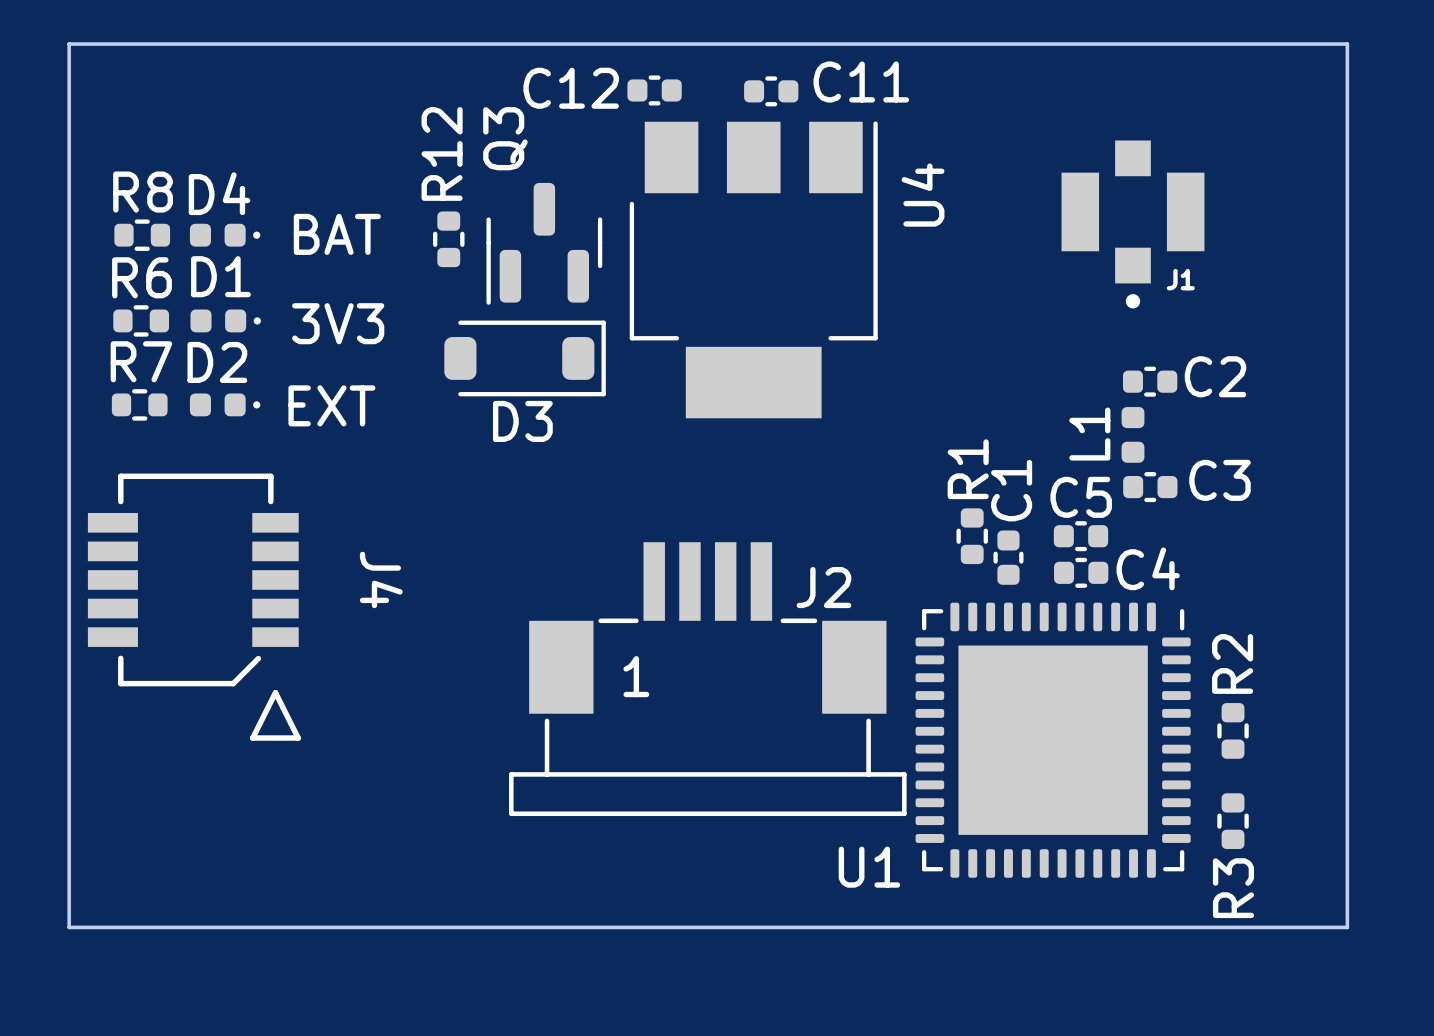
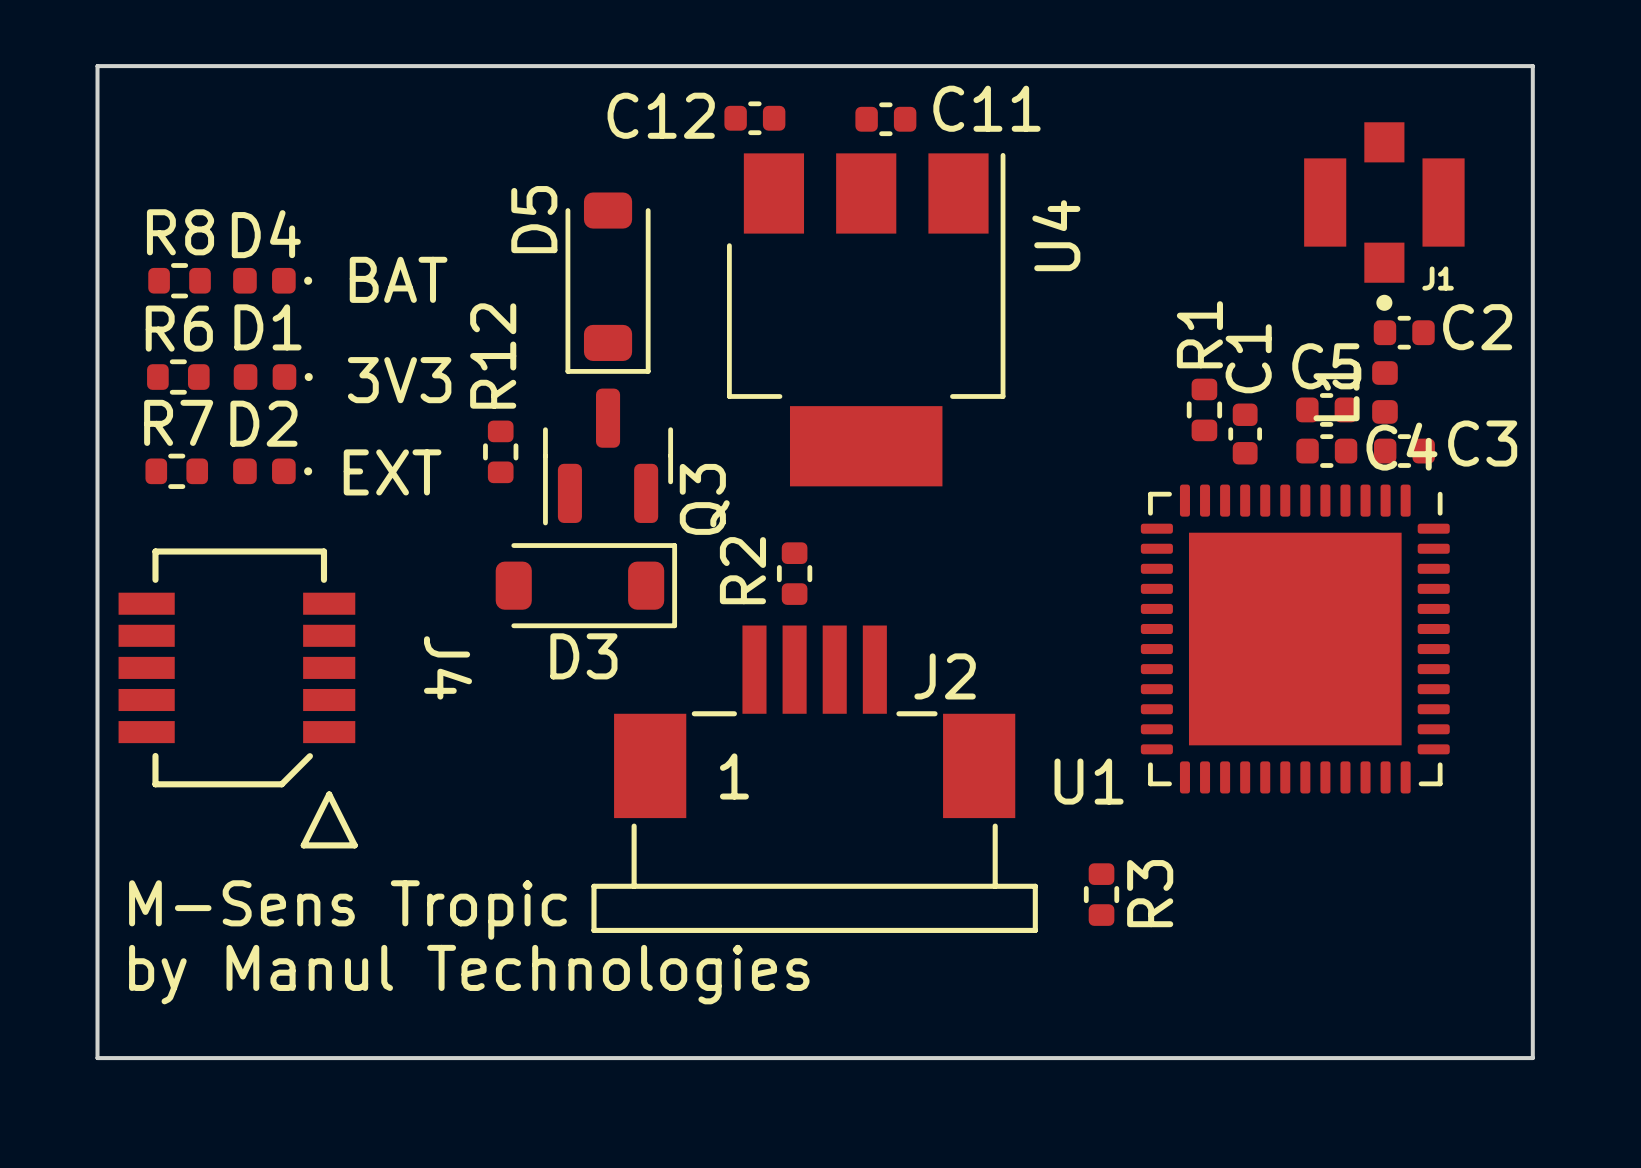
Q3 name position: Q3 (505, 138) -> Q3 (704, 499)
J1 position: (1132, 224) -> (1384, 216)
D5: none -> (608, 283)
R12 position: (448, 239) -> (500, 451)
Q3 position: (544, 243) -> (608, 456)
D3 position: (525, 358) -> (586, 585)
C2 position: (1150, 381) -> (1404, 332)
L1 position: (1132, 434) -> (1384, 392)
C3 position: (1150, 487) -> (1404, 451)
R1 position: (972, 536) -> (1204, 409)
C5 position: (1081, 536) -> (1326, 409)
C1 position: (1008, 557) -> (1245, 434)
C4 position: (1081, 572) -> (1326, 451)
R2 name position: R2 (1232, 663) -> R2 (742, 570)
R2 position: (1233, 730) -> (794, 573)
U1 position: (1053, 740) -> (1295, 639)
text: none -> M-Sens Tropic (347, 910)
R3 position: (1233, 821) -> (1101, 894)
text: none -> by Manul Technologies (469, 974)
R3 name position: R3 (1233, 888) -> R3 (1150, 893)

